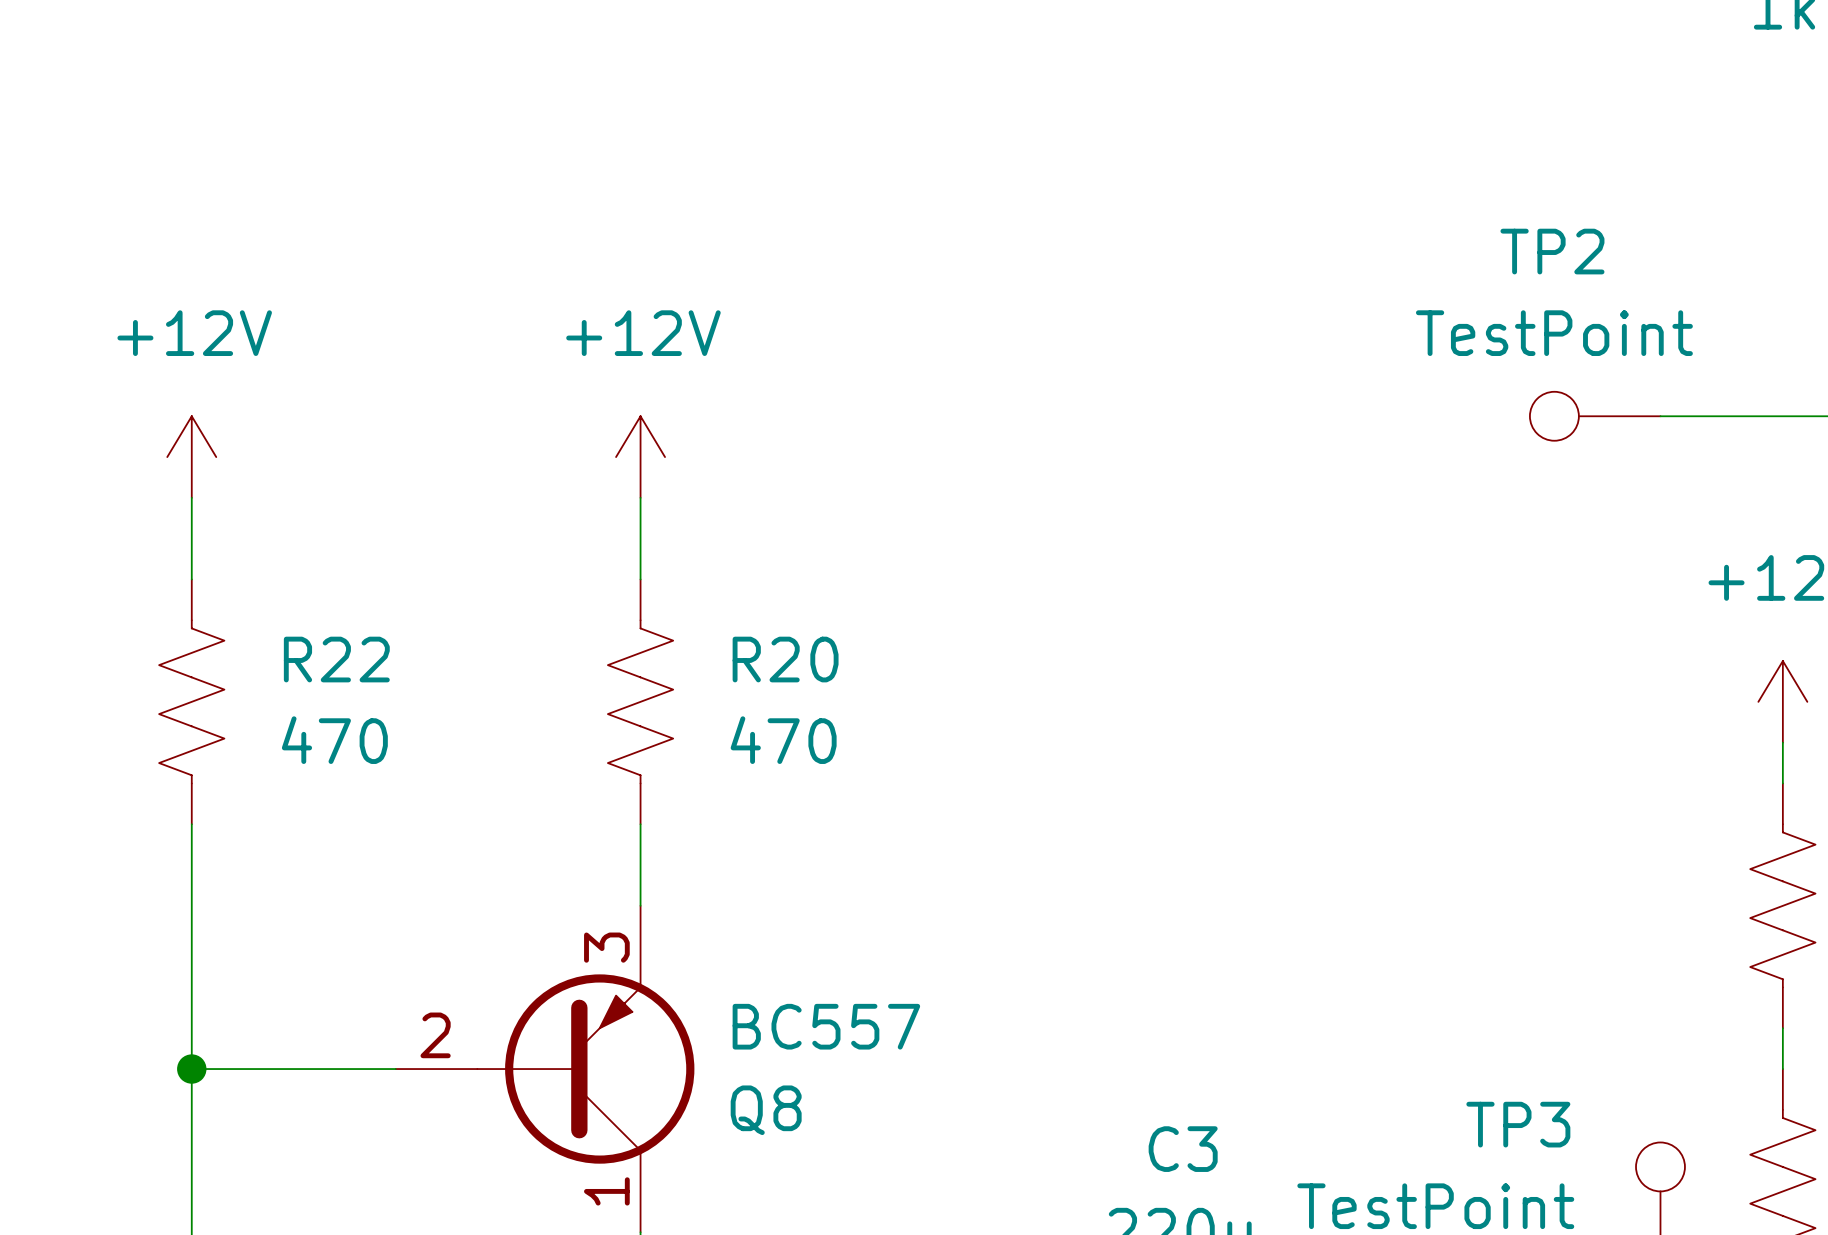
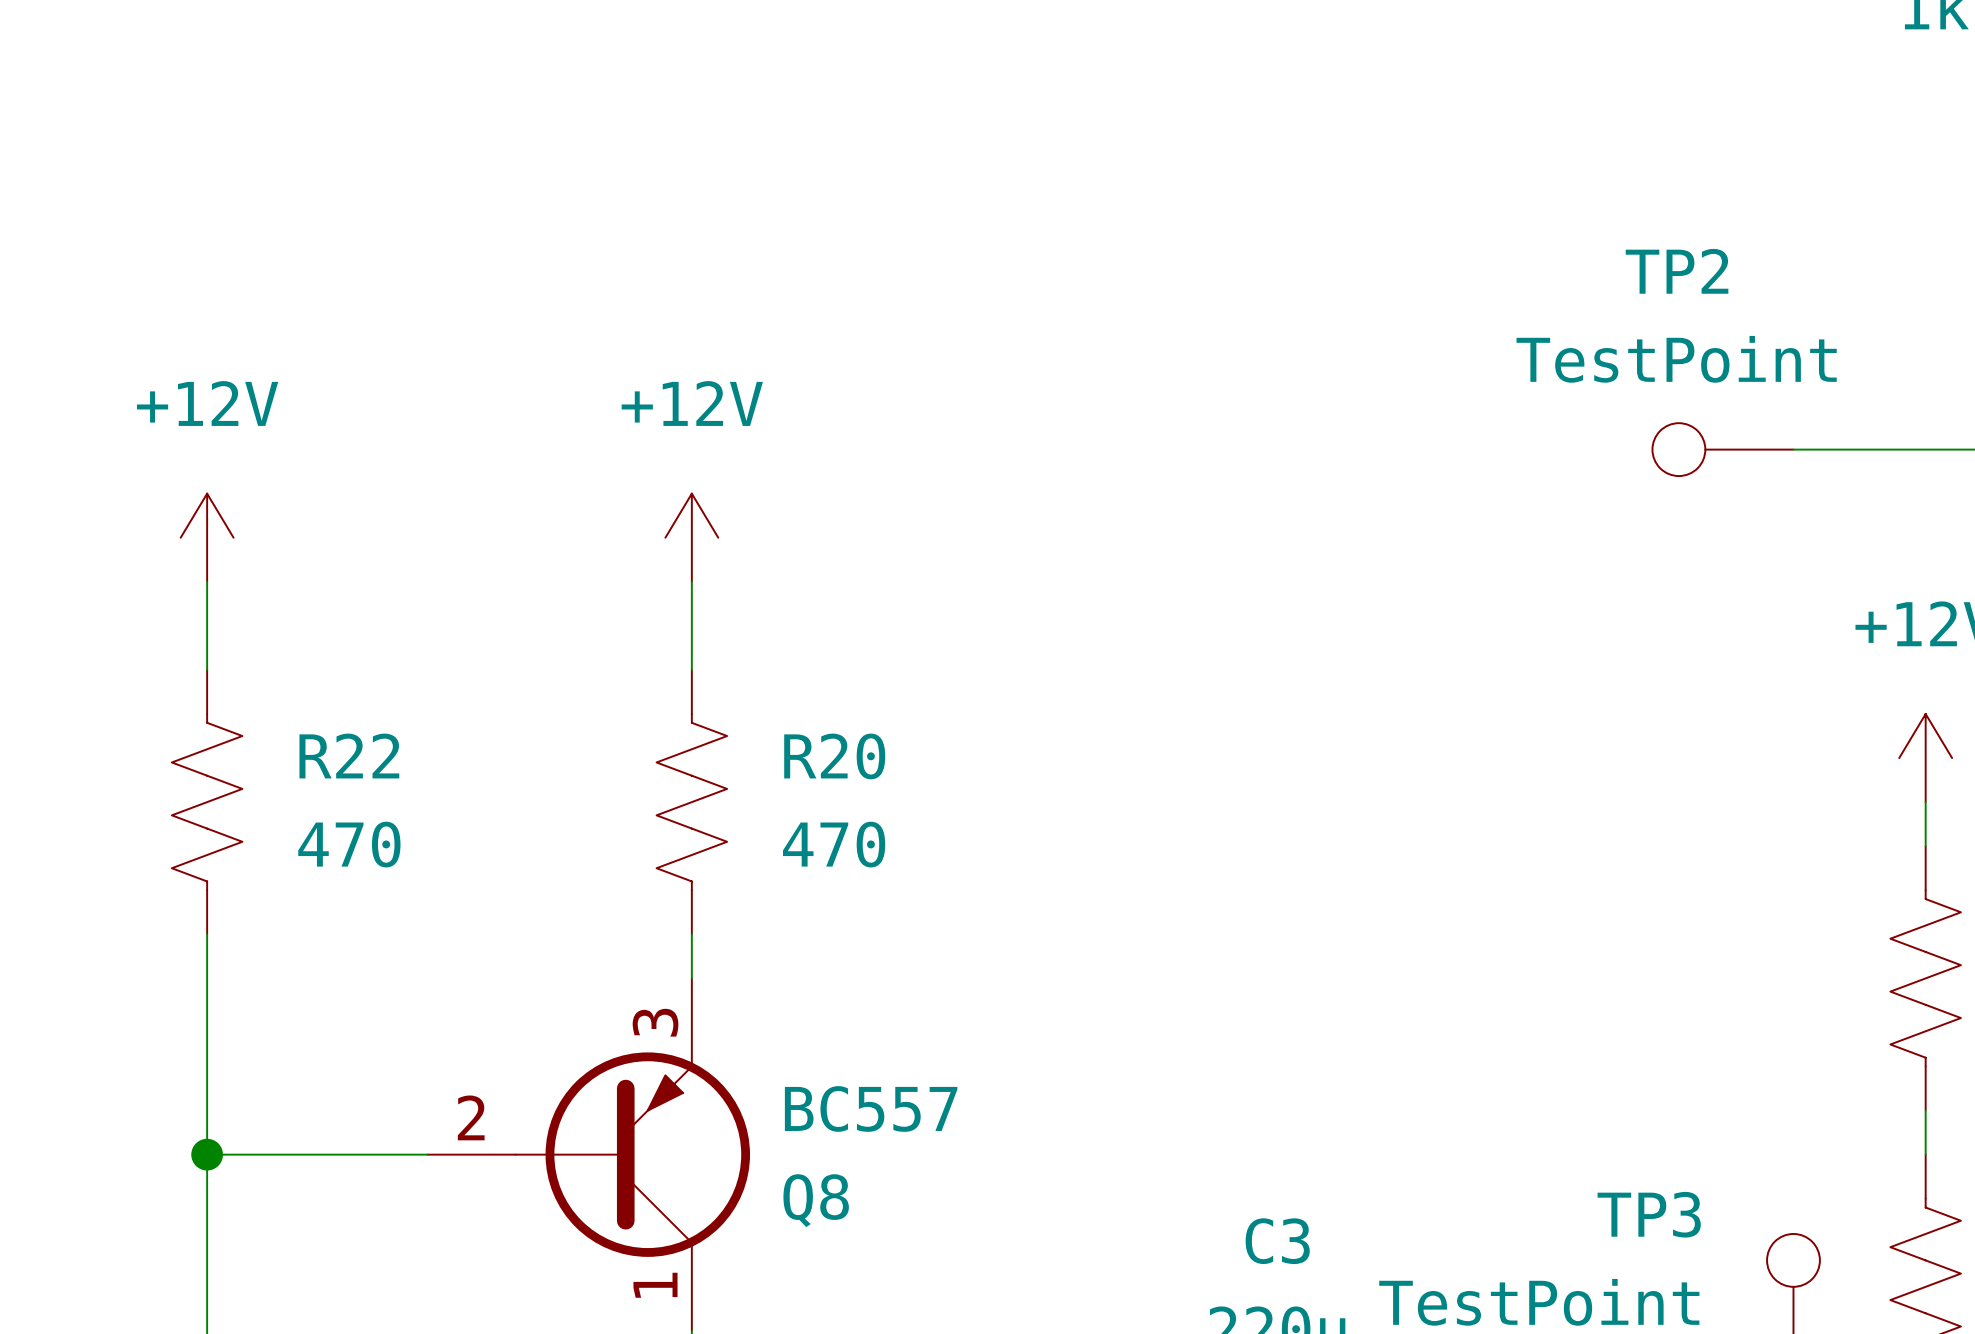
power symbol position: +12V (191, 457) -> +12V (207, 537)
power symbol position: +12V (640, 457) -> +12V (691, 537)
R22 position: (191, 701) -> (207, 802)
R20 position: (640, 701) -> (691, 802)

